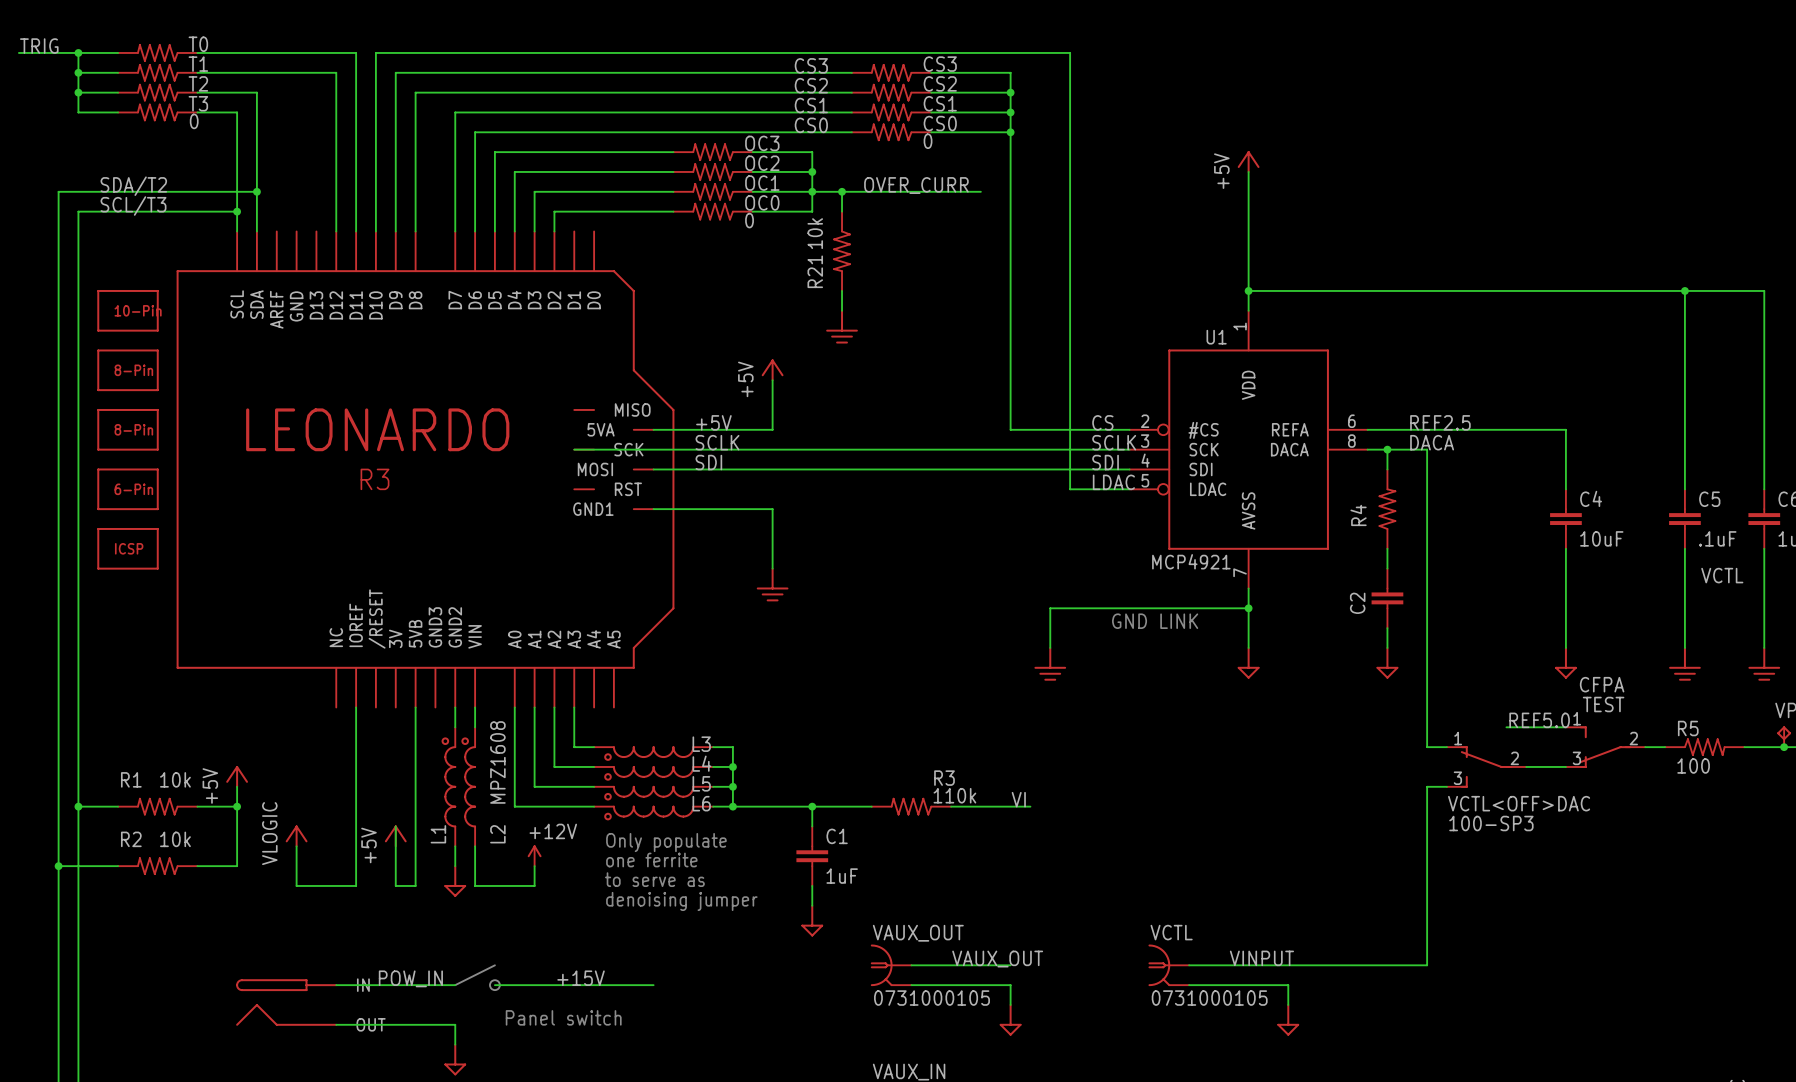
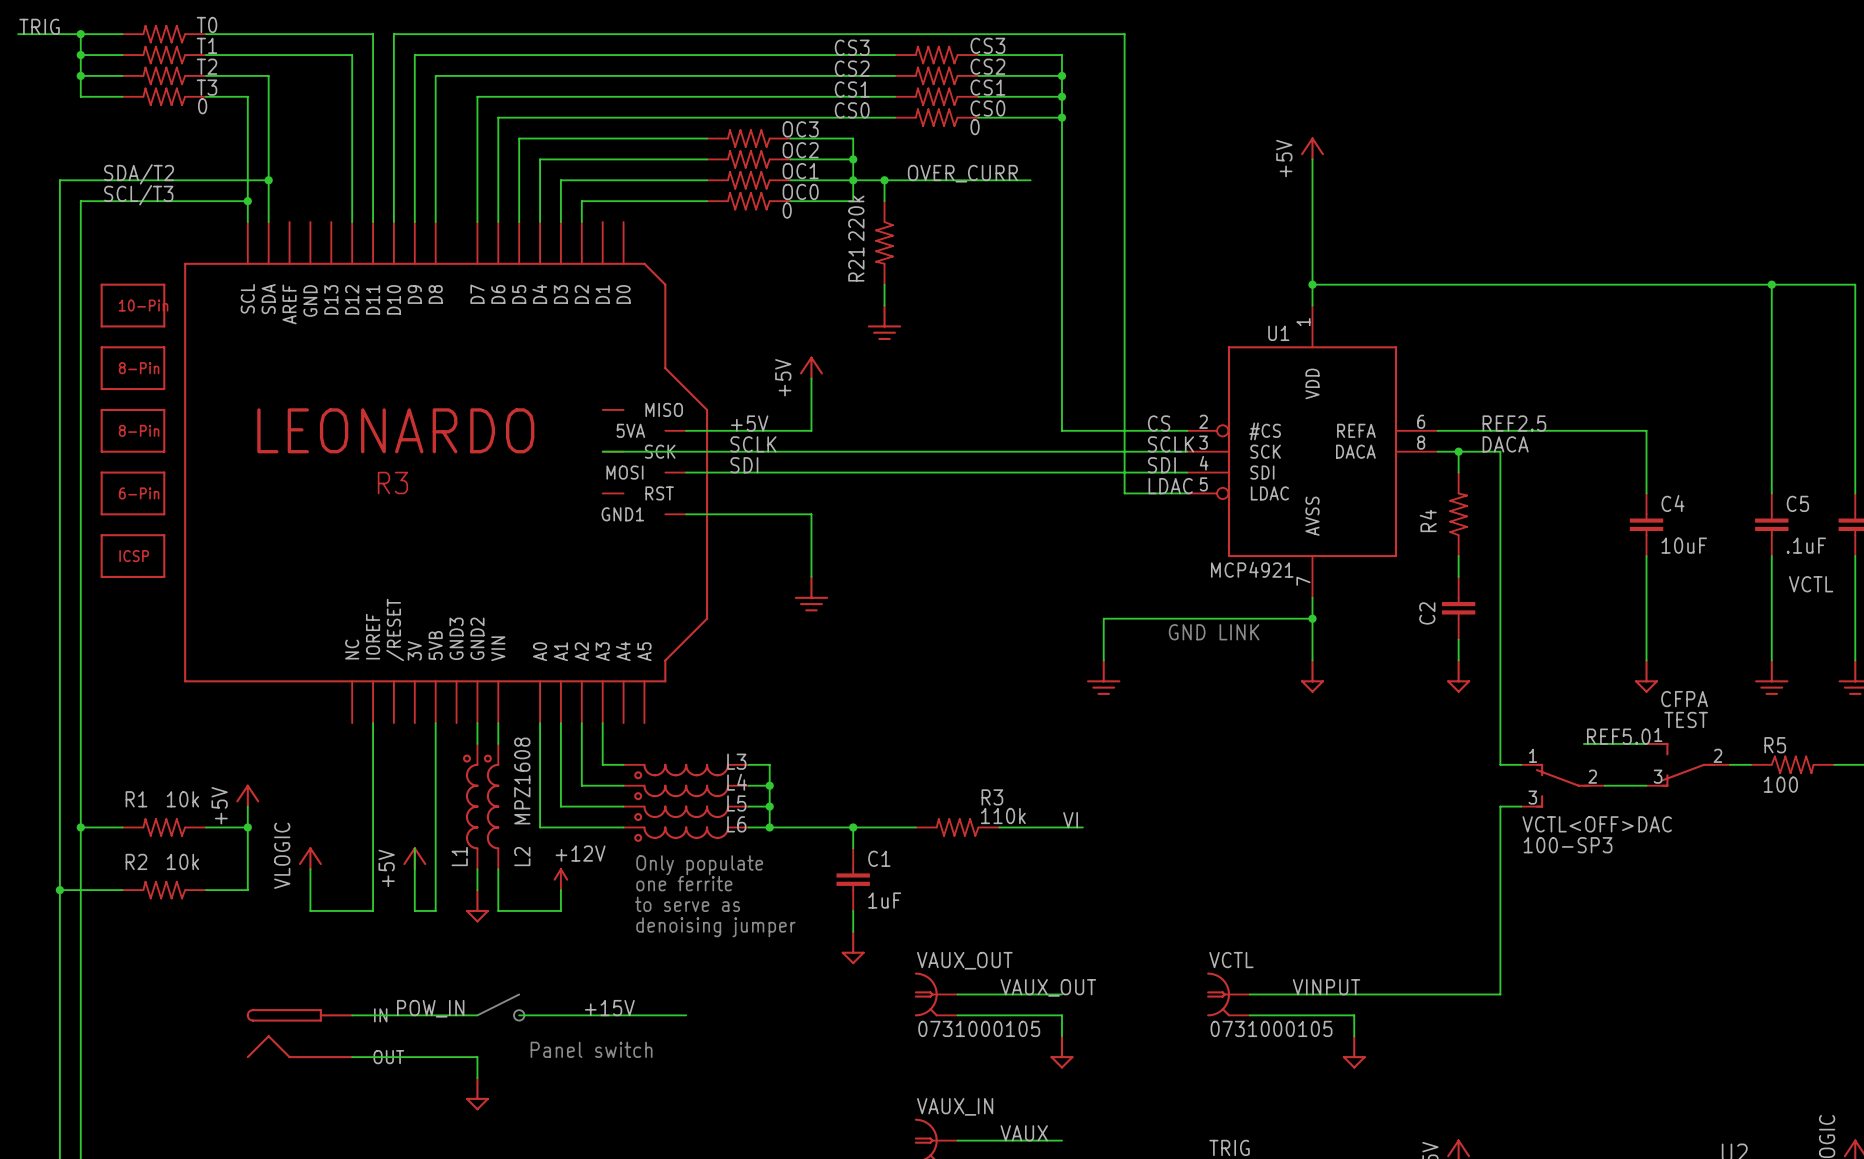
R21 value: 10k (815, 233) -> 220k (856, 218)

